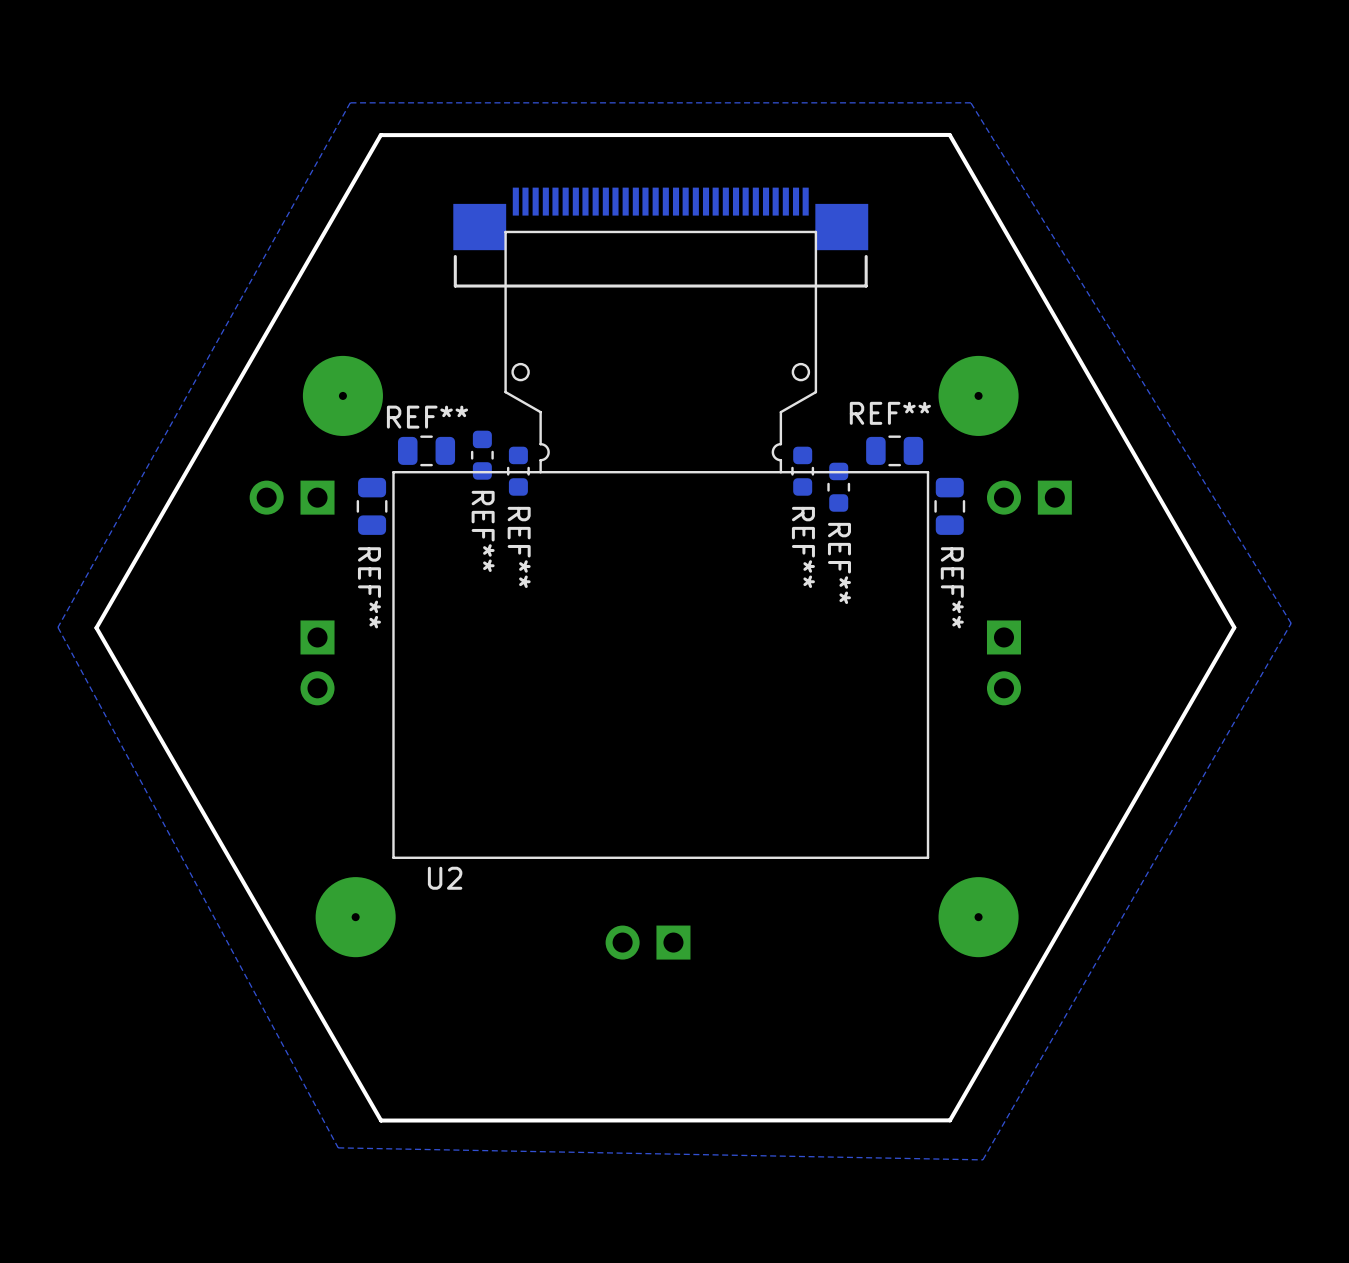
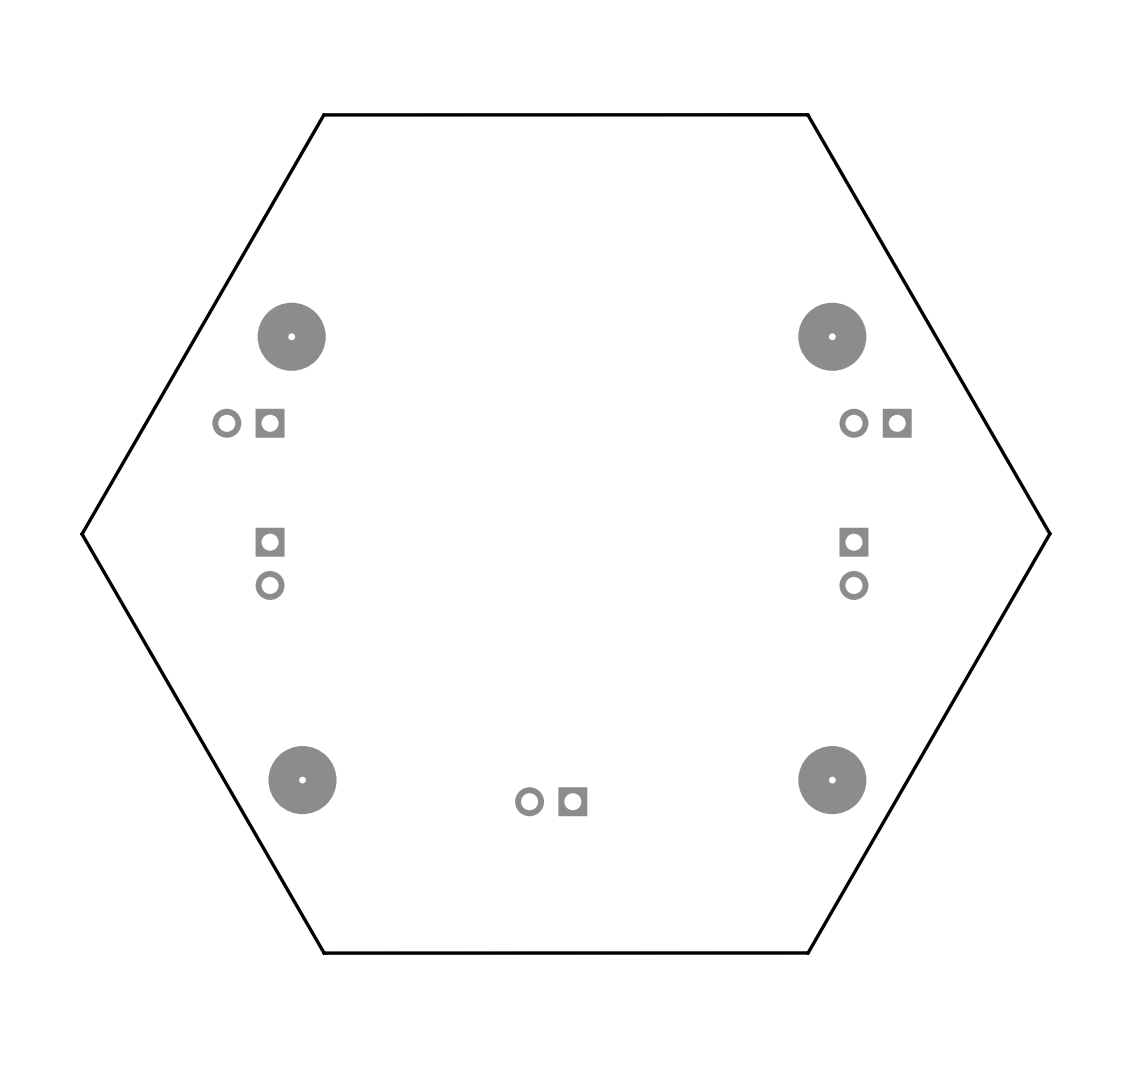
zone outline: (970, 102) (1291, 623) (982, 1159) (338, 1147) (57, 627) (350, 102) (970, 102) -> none
REF**: (426, 450) -> none
REF**: (894, 450) -> none
REF**: (482, 455) -> none
REF**: (518, 471) -> none
REF**: (802, 471) -> none
REF**: (838, 487) -> none
REF**: (372, 506) -> none
REF**: (949, 506) -> none
U2: (660, 523) -> none

